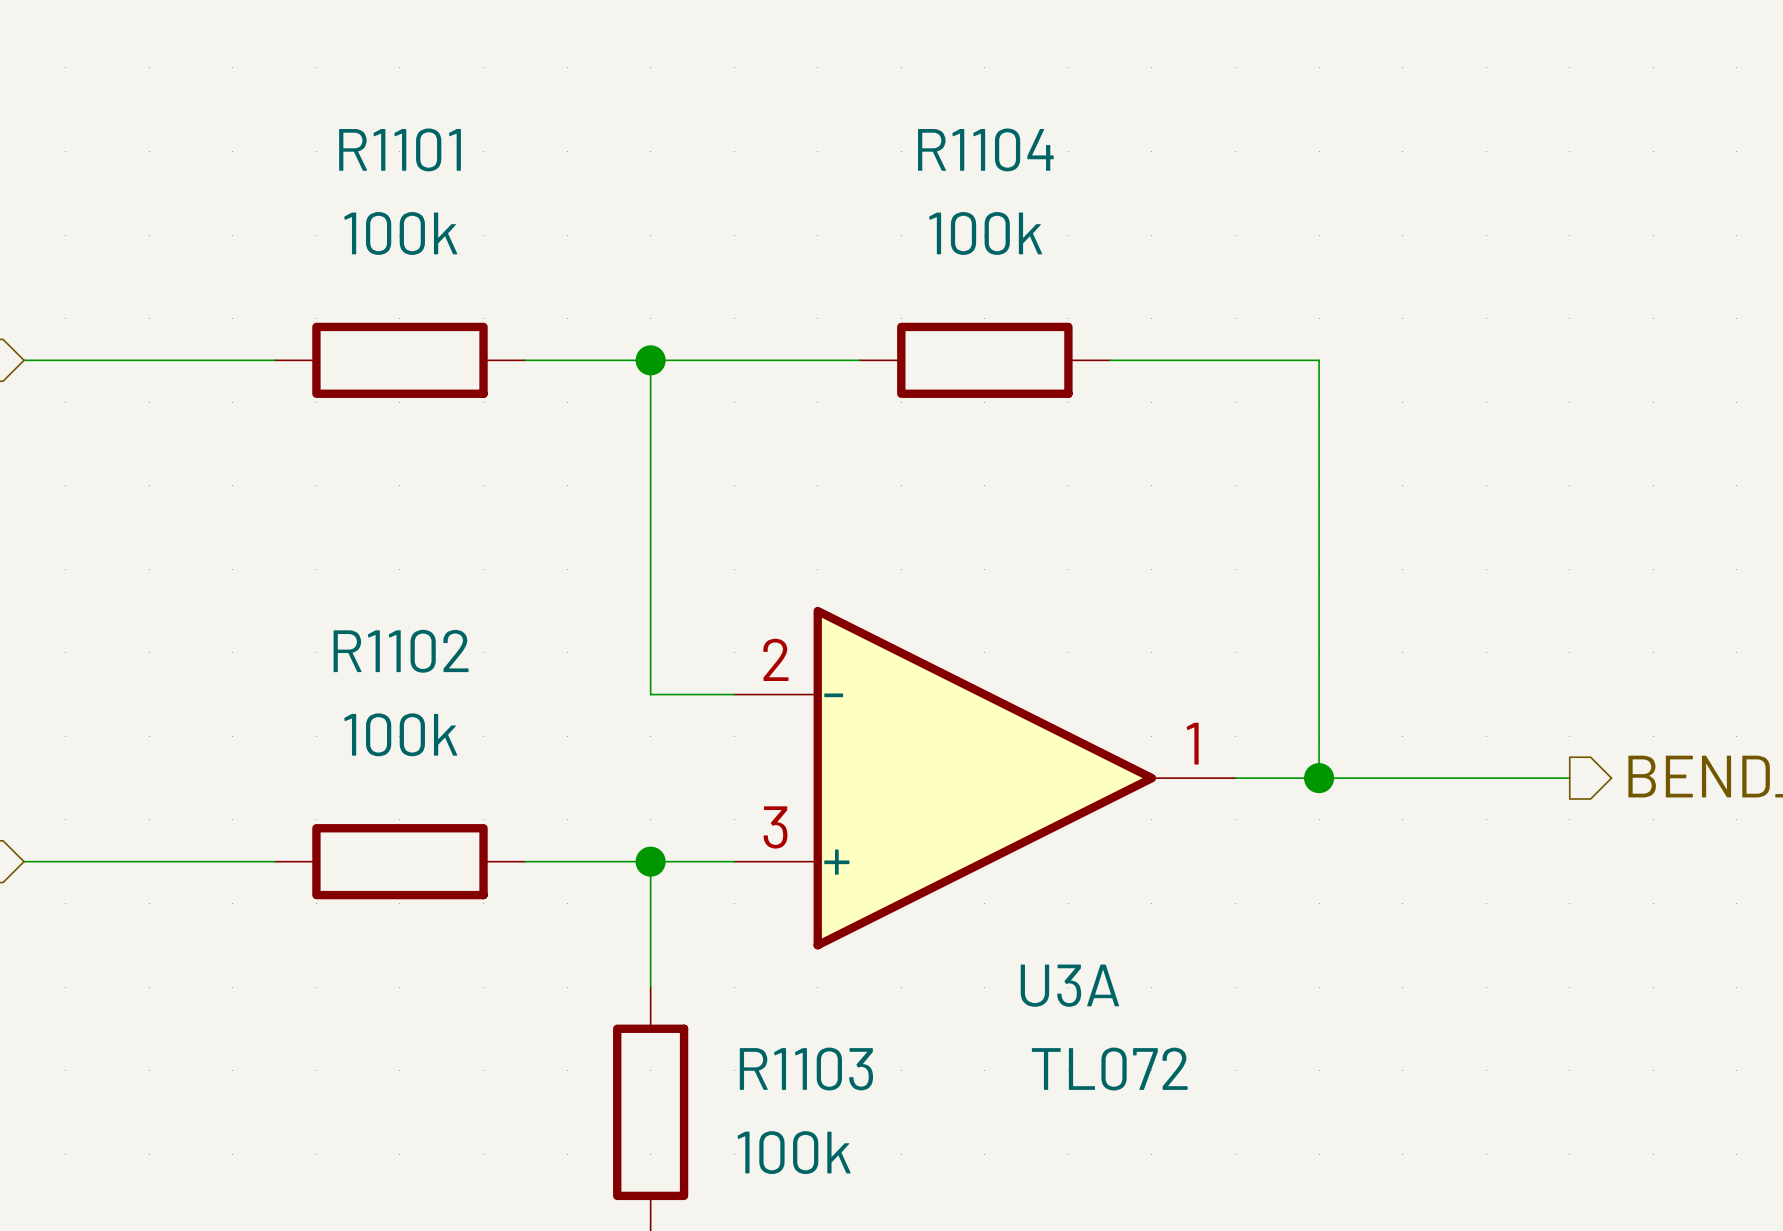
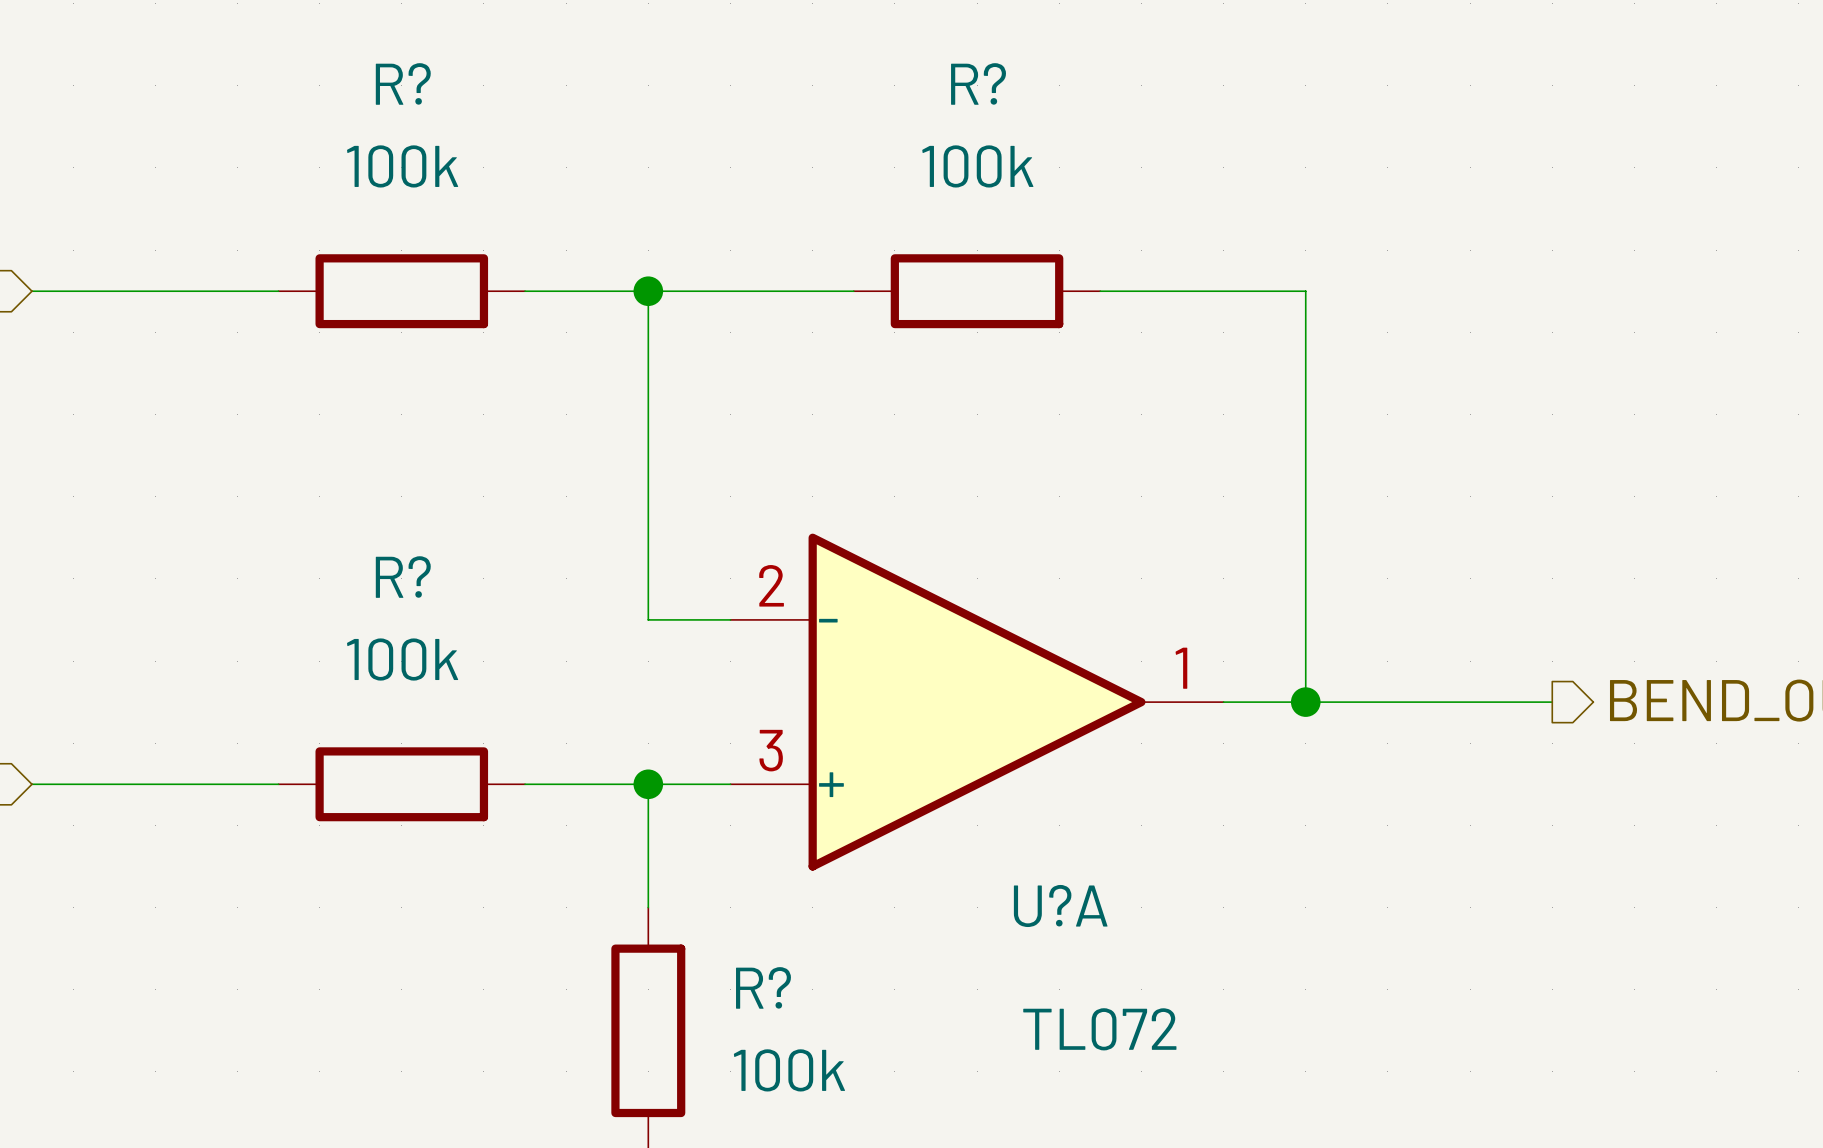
R1101 name: R1101 (400, 149) -> R? (403, 83)
R1104 name: R1104 (985, 149) -> R? (978, 83)
R1102 name: R1102 (401, 651) -> R? (403, 577)
U3A name: U3A (1069, 985) -> U?A (1060, 905)
R1103 name: R1103 (806, 1069) -> R? (763, 987)
U3A value position: TL072 (1109, 1069) -> TL072 (1099, 1029)

